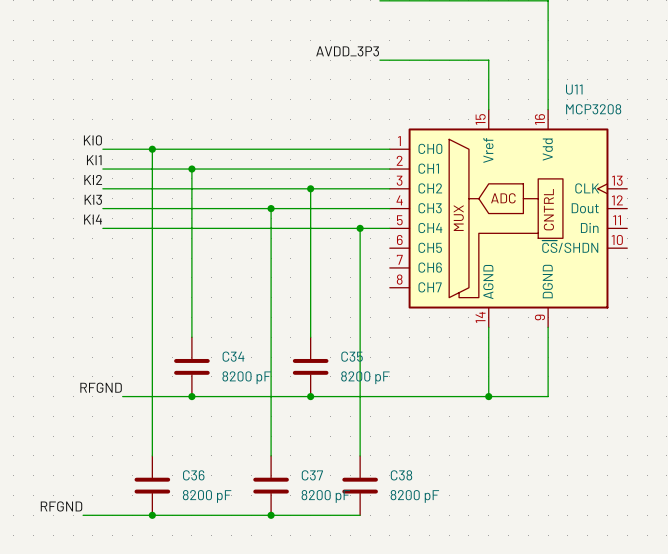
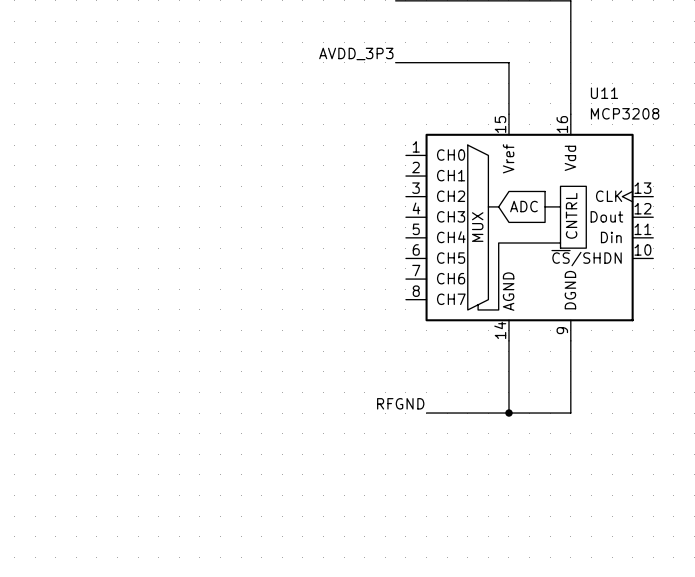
label: KI0 (92, 140) -> none
wire: (102, 149) (389, 149) -> none
wire: (152, 149) (152, 455) -> none
junction: (152, 149) -> none
label: KI1 (94, 160) -> none
wire: (102, 169) (389, 169) -> none
wire: (191, 169) (191, 337) -> none
junction: (191, 169) -> none
label: KI2 (93, 179) -> none
wire: (102, 188) (389, 188) -> none
wire: (310, 188) (310, 337) -> none
junction: (310, 188) -> none
label: KI3 (93, 199) -> none
wire: (102, 208) (389, 208) -> none
wire: (271, 208) (271, 455) -> none
junction: (271, 208) -> none
label: KI4 (93, 219) -> none
wire: (102, 228) (389, 228) -> none
wire: (360, 228) (360, 455) -> none
junction: (360, 228) -> none
C34: 8200 pF (191, 366) -> none
C35: 8200 pF (310, 366) -> none
label: RFGND (101, 387) -> none
label: none -> RFGND (400, 403)
wire: (122, 396) (409, 396) -> none
junction: (191, 396) -> none
junction: (310, 396) -> none
C36: 8200 pF (152, 485) -> none
C37: 8200 pF (271, 485) -> none
C38: 8200 pF (360, 485) -> none
label: RFGND (61, 506) -> none
wire: (83, 515) (360, 515) -> none
junction: (152, 515) -> none
junction: (271, 515) -> none

